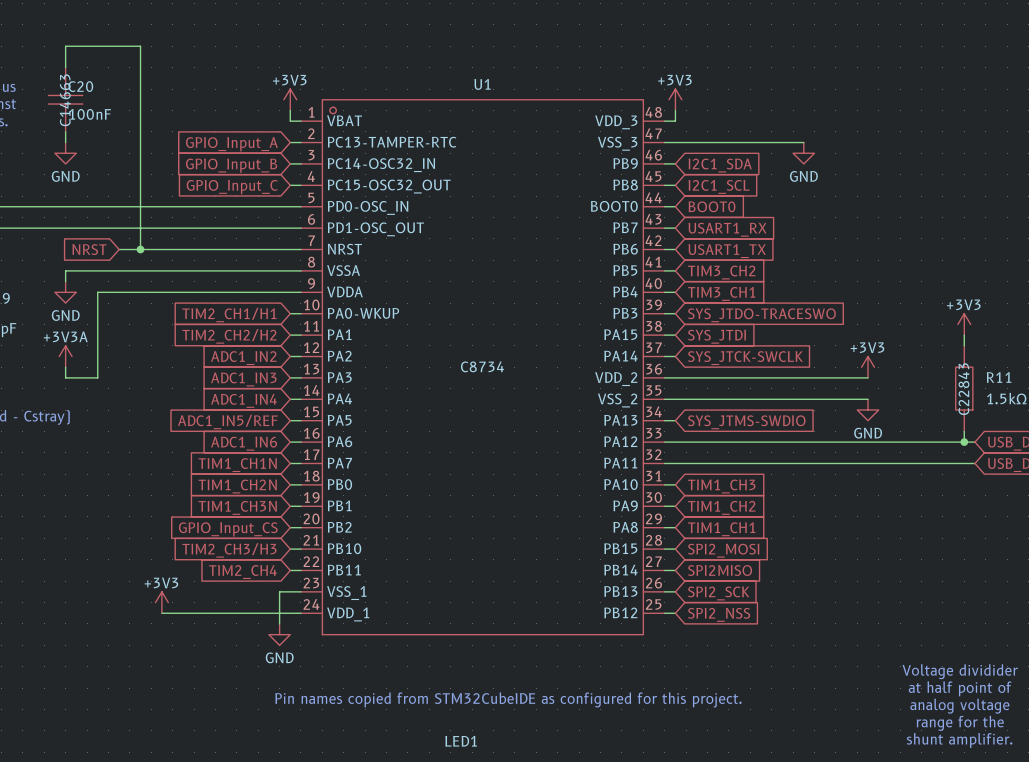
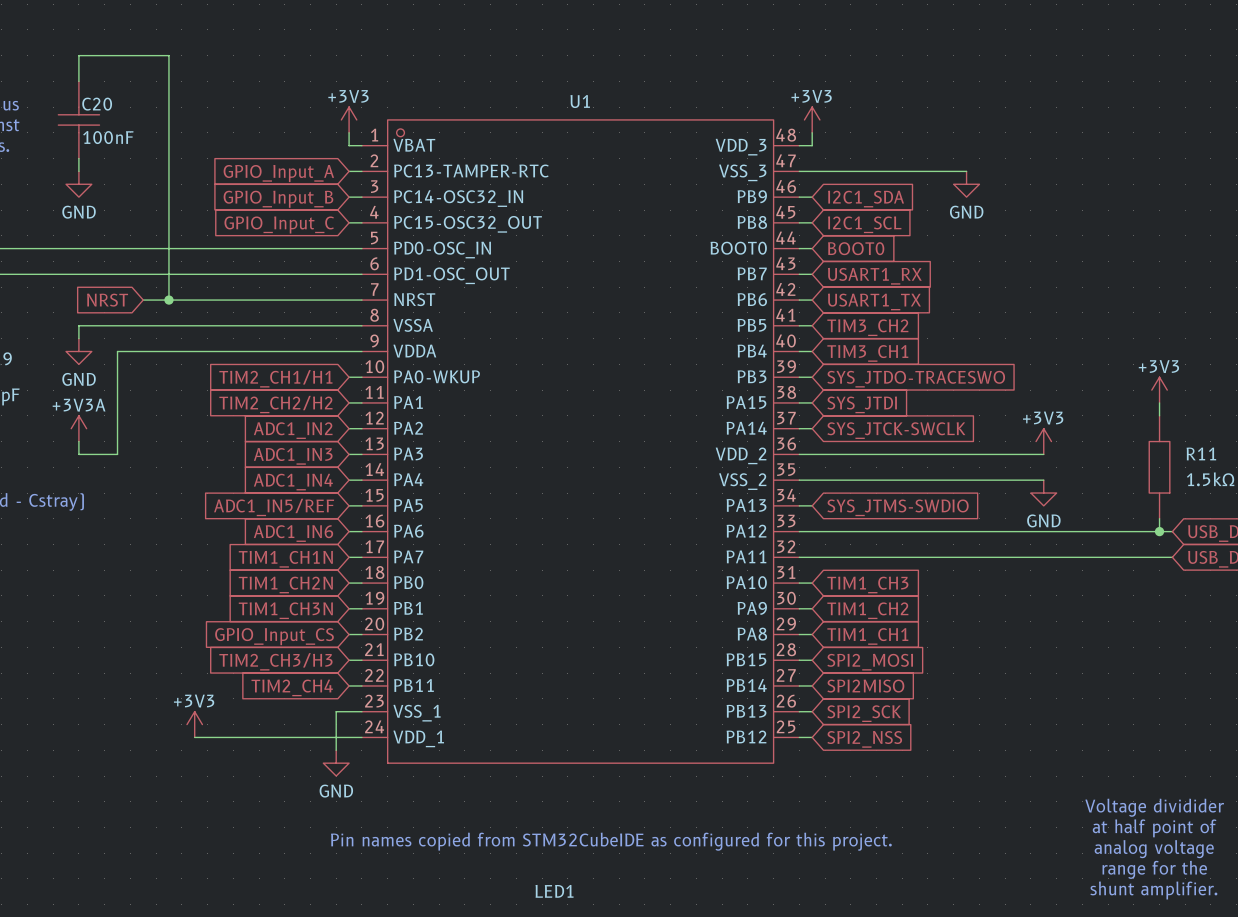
C20 text: C14663 (65, 100) -> none
U1 text: C8734 (482, 366) -> none
R11 text: C22843 (963, 389) -> none

